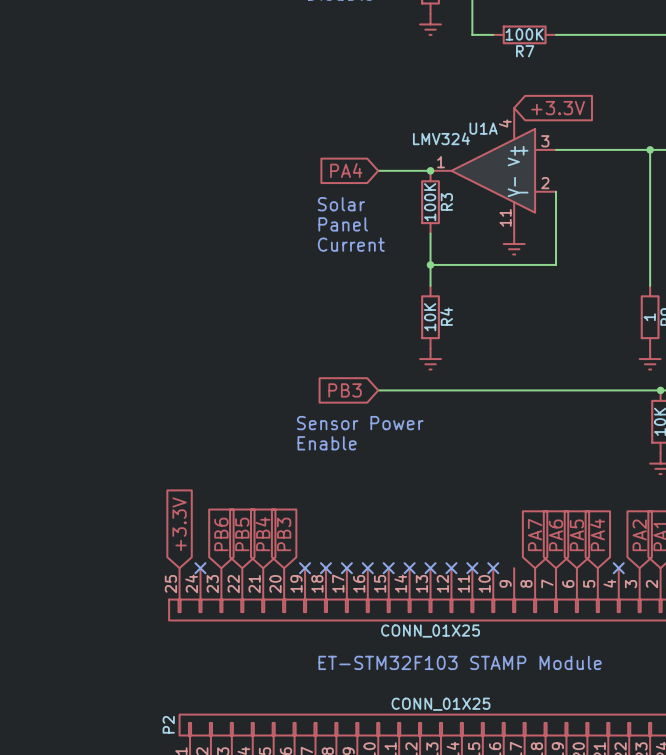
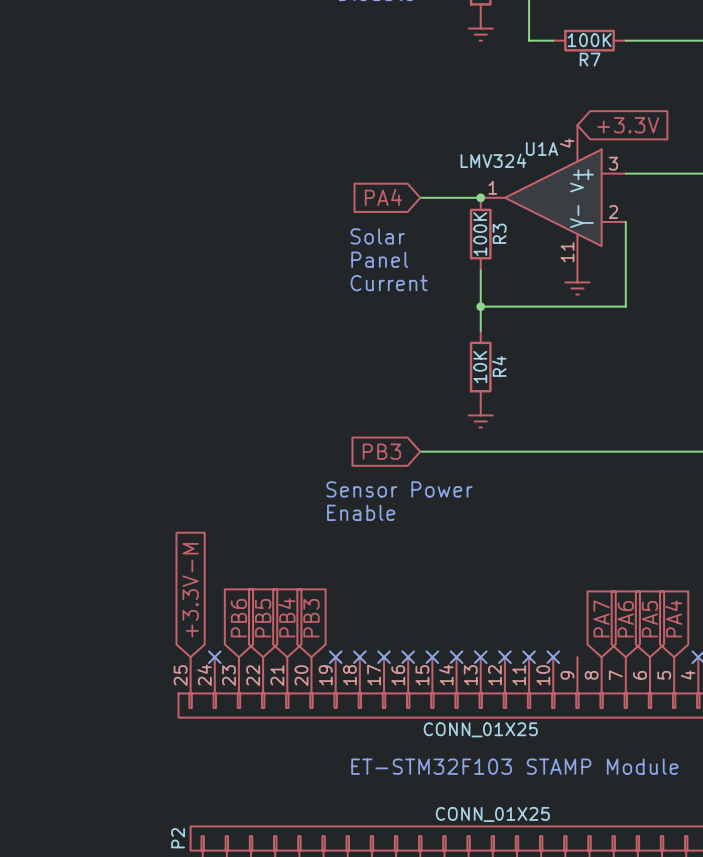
global label: +3.3V (179, 524) -> +3.3V-M (190, 590)

